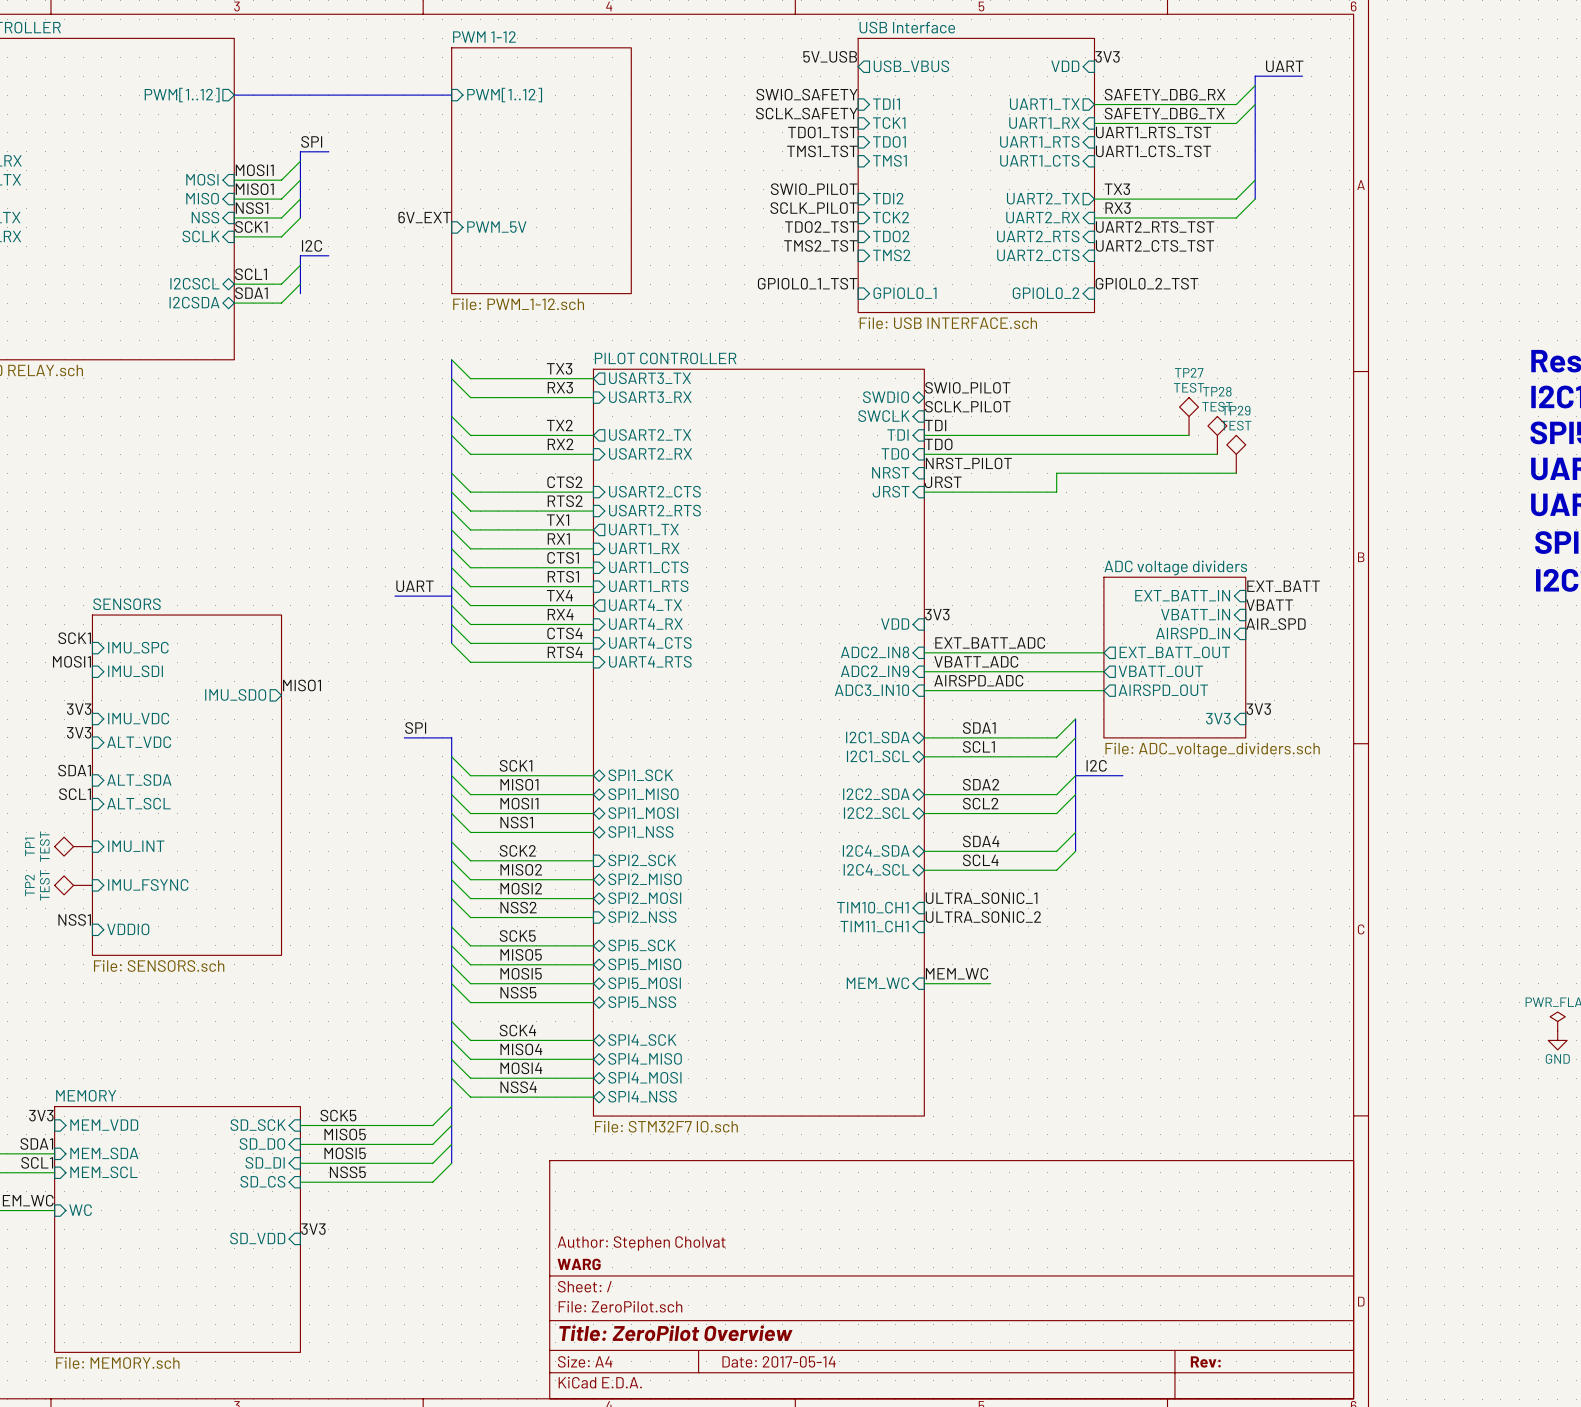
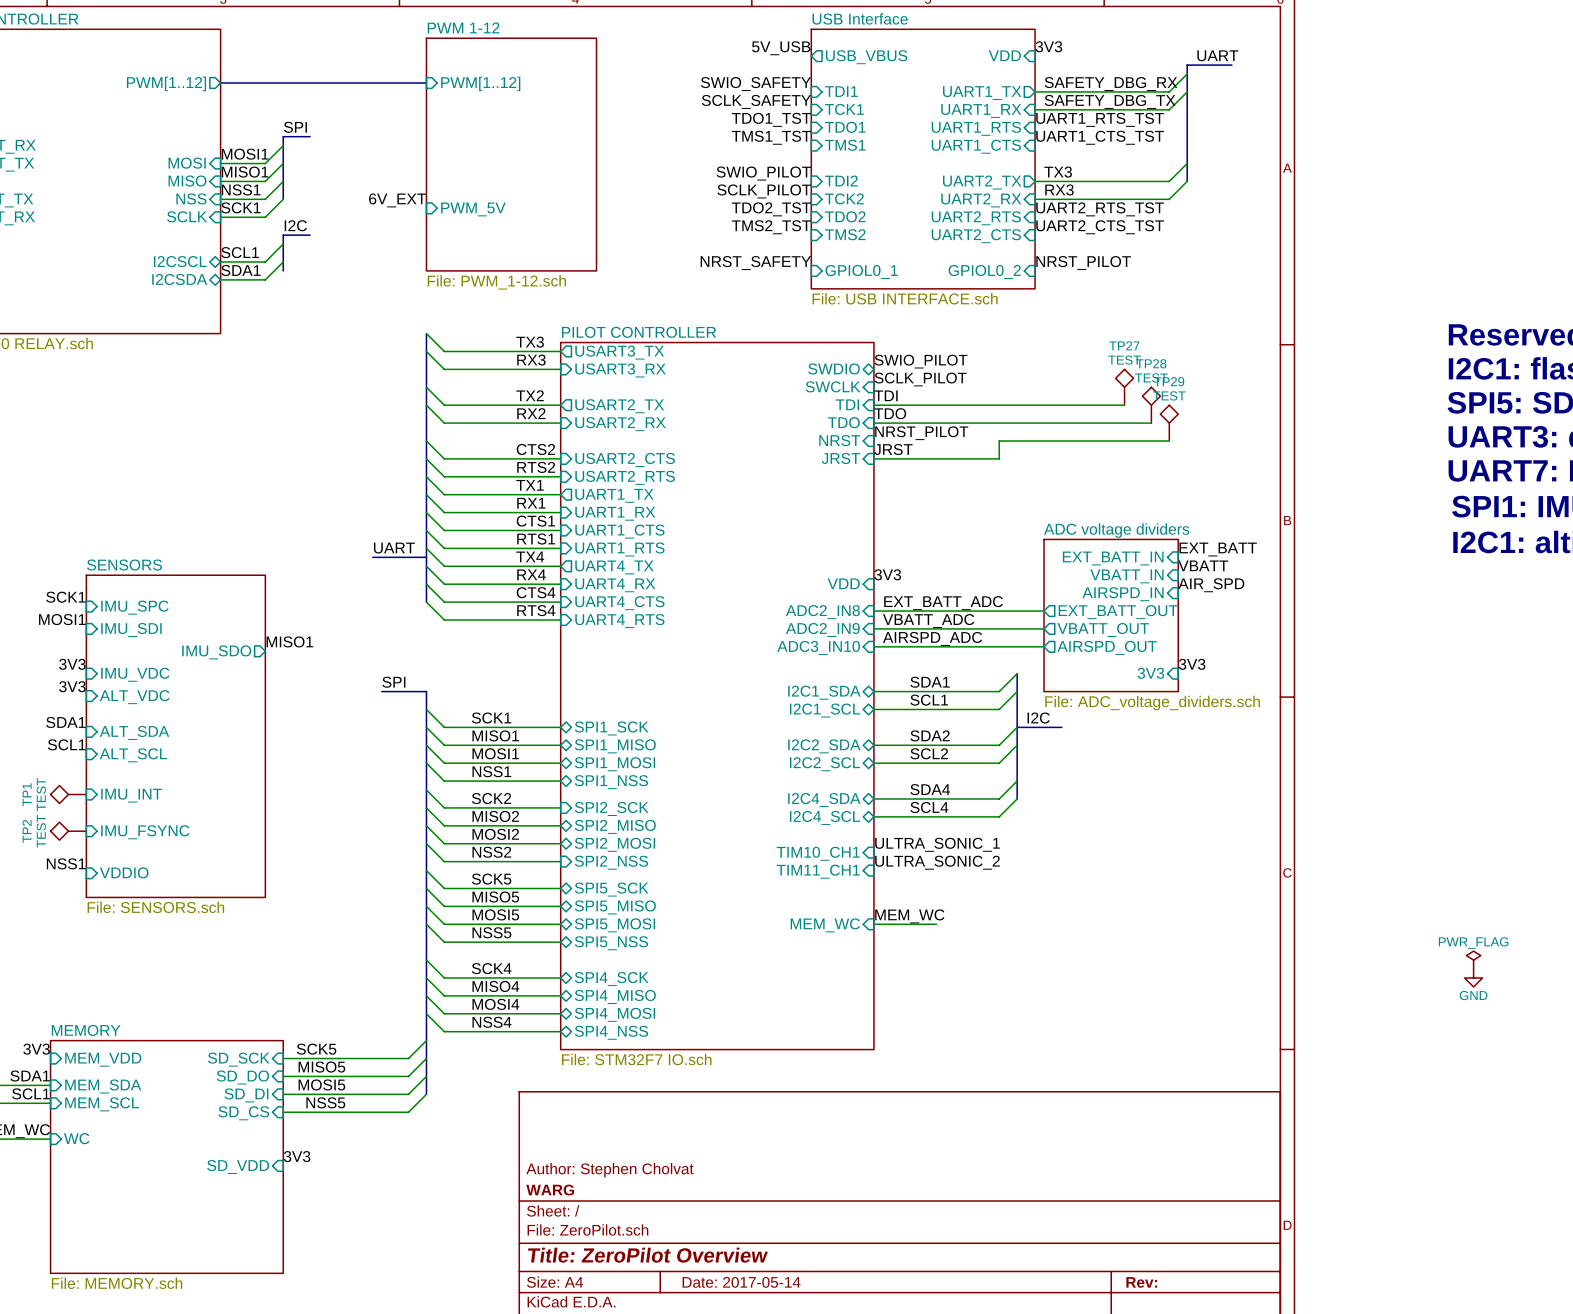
label: GPIOL0_1_TST (807, 283) -> NRST_SAFETY (755, 263)
label: GPIOL0_2_TST (1146, 283) -> NRST_PILOT (1083, 263)

